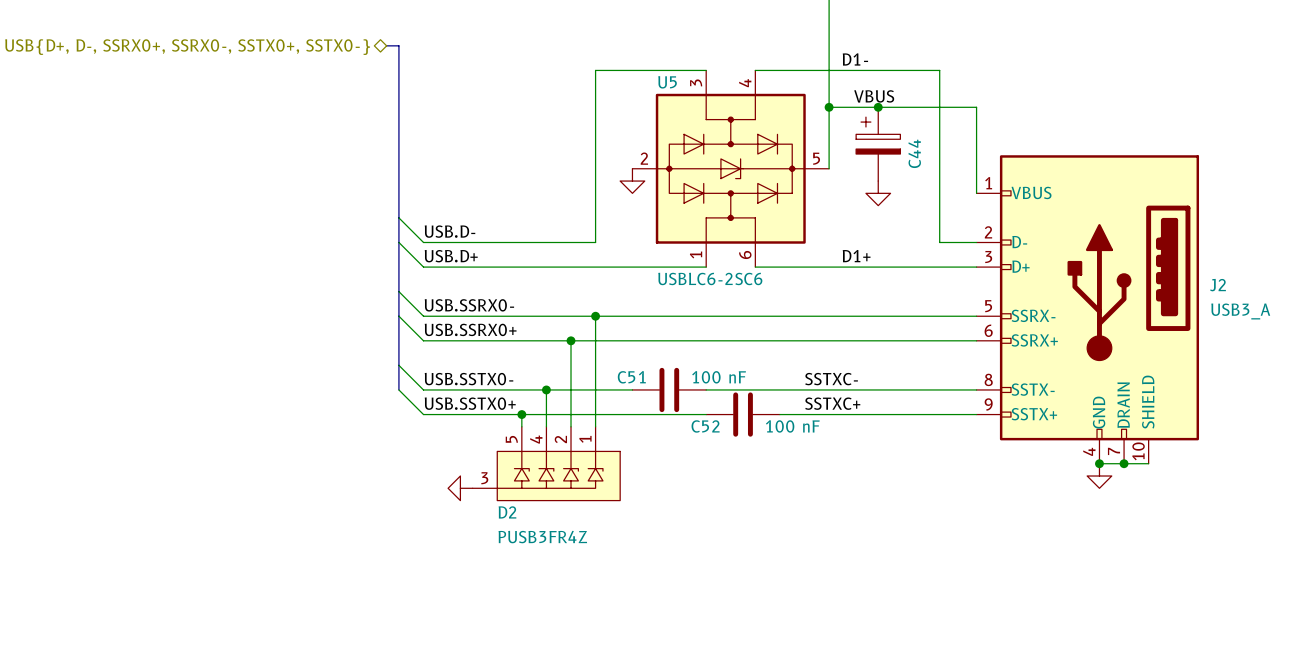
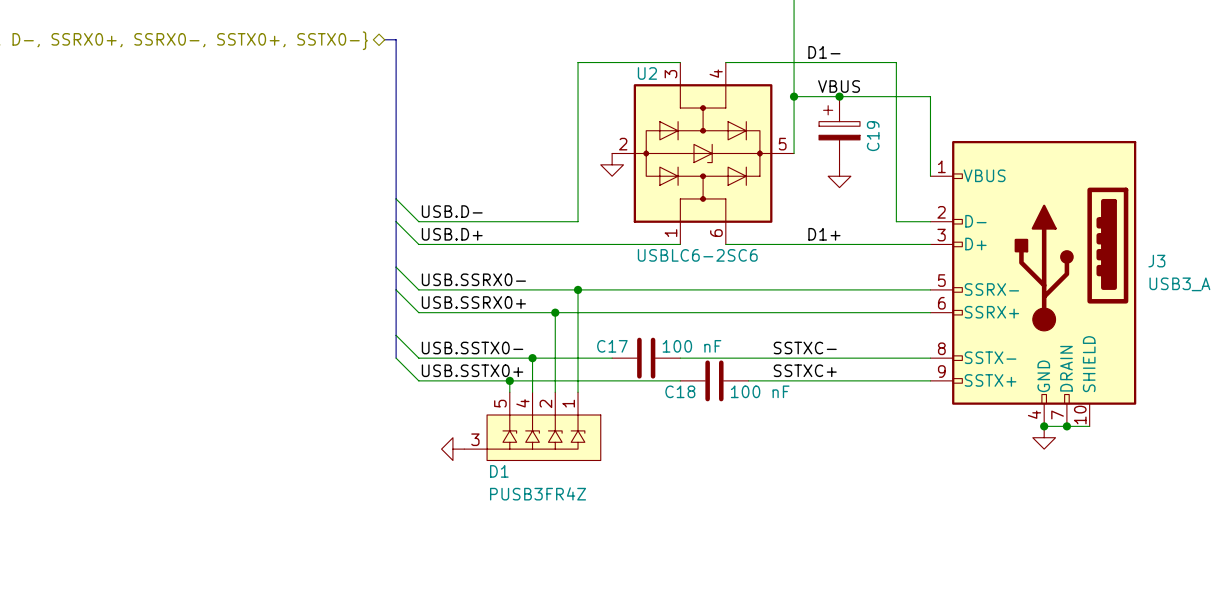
U5 name: U5 (667, 82) -> U2 (647, 73)
C44 name: C44 (914, 153) -> C19 (873, 136)
J2 name: J2 (1217, 285) -> J3 (1156, 261)
C51 name: C51 (631, 377) -> C17 (612, 346)
C52 name: C52 (705, 426) -> C18 (680, 391)
D2 name: D2 (507, 512) -> D1 (499, 471)

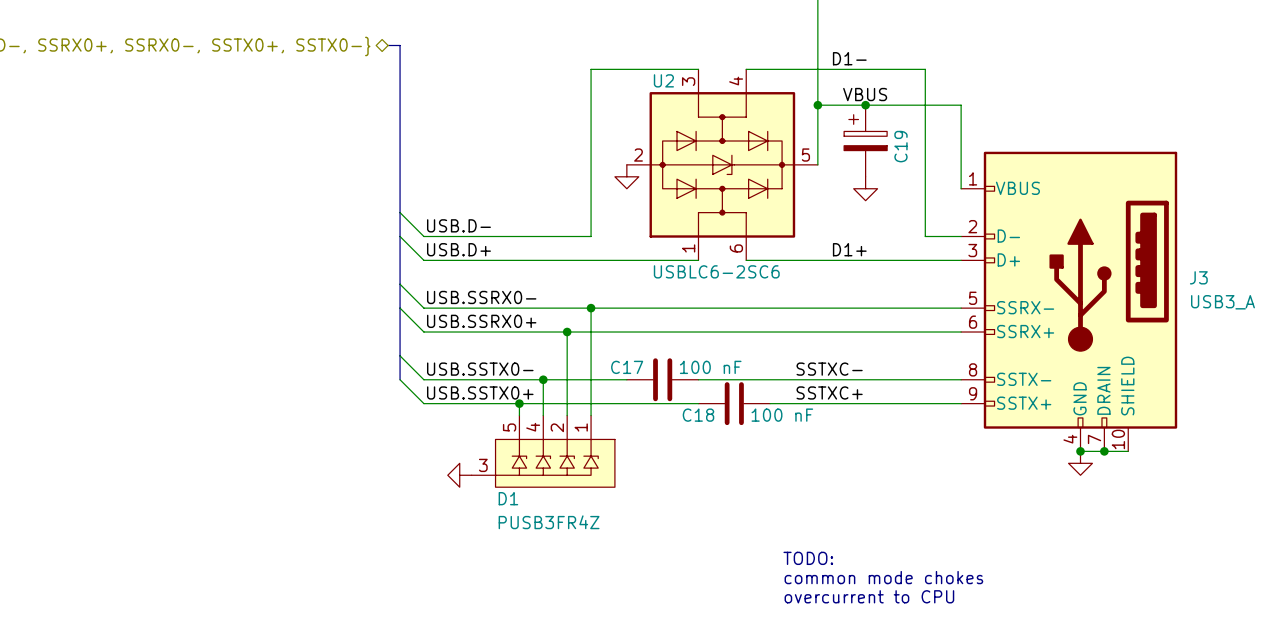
text: none -> TODO: (808, 558)
text: none -> common mode chokes (883, 577)
text: none -> overcurrent to CPU (869, 596)

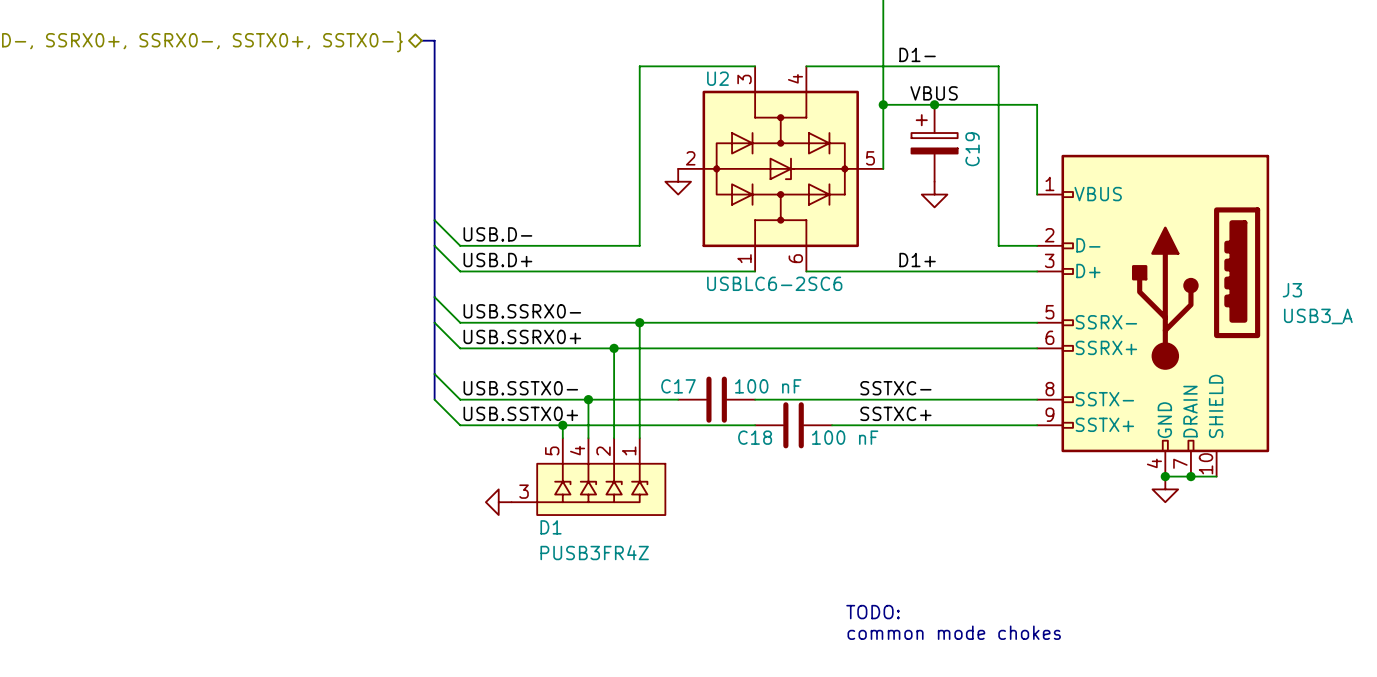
text: TODO: (808, 558) -> none
text: common mode chokes (883, 577) -> TODO: (873, 612)
text: overcurrent to CPU (869, 596) -> common mode chokes (954, 632)

